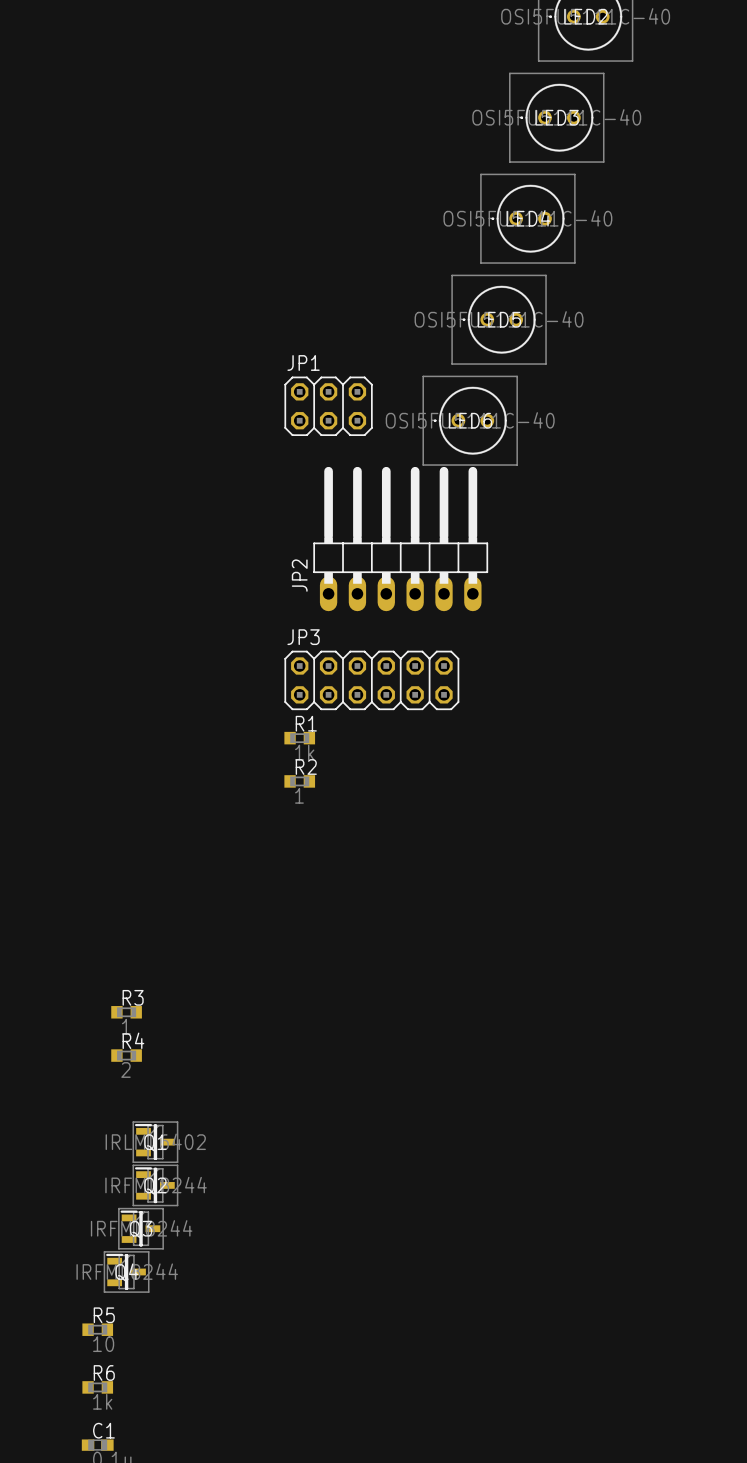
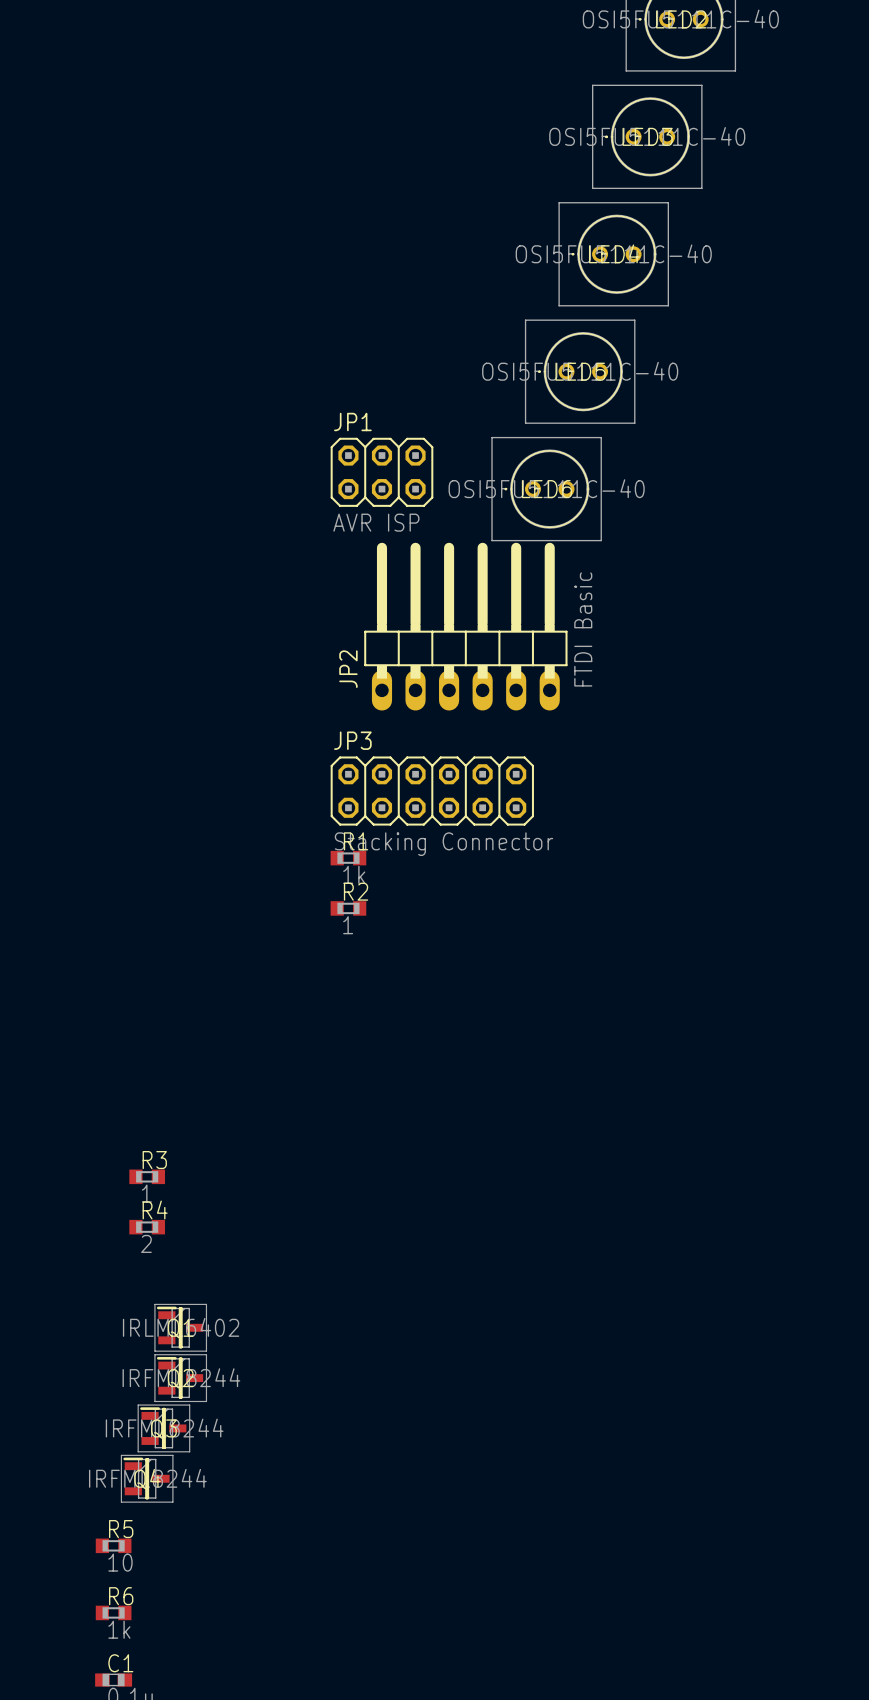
JP1 value: none -> AVR ISP (376, 522)
JP2 value: none -> FTDI Basic (583, 629)
JP3 value: none -> Stacking Connector (443, 844)

